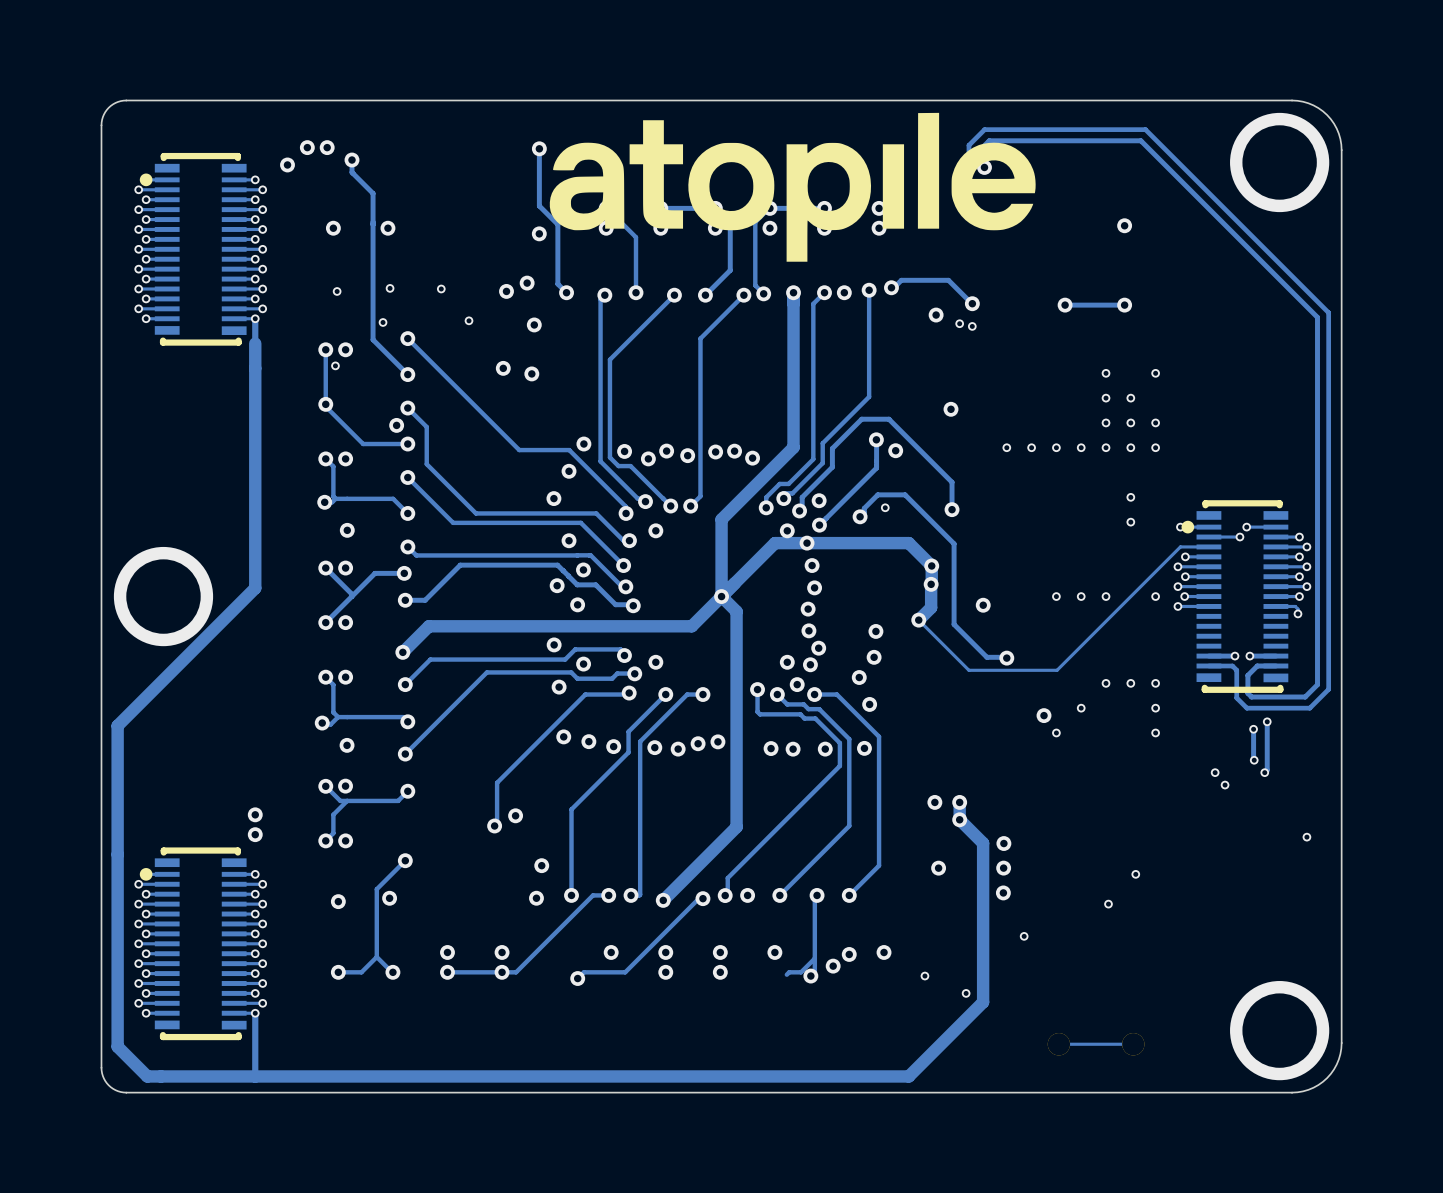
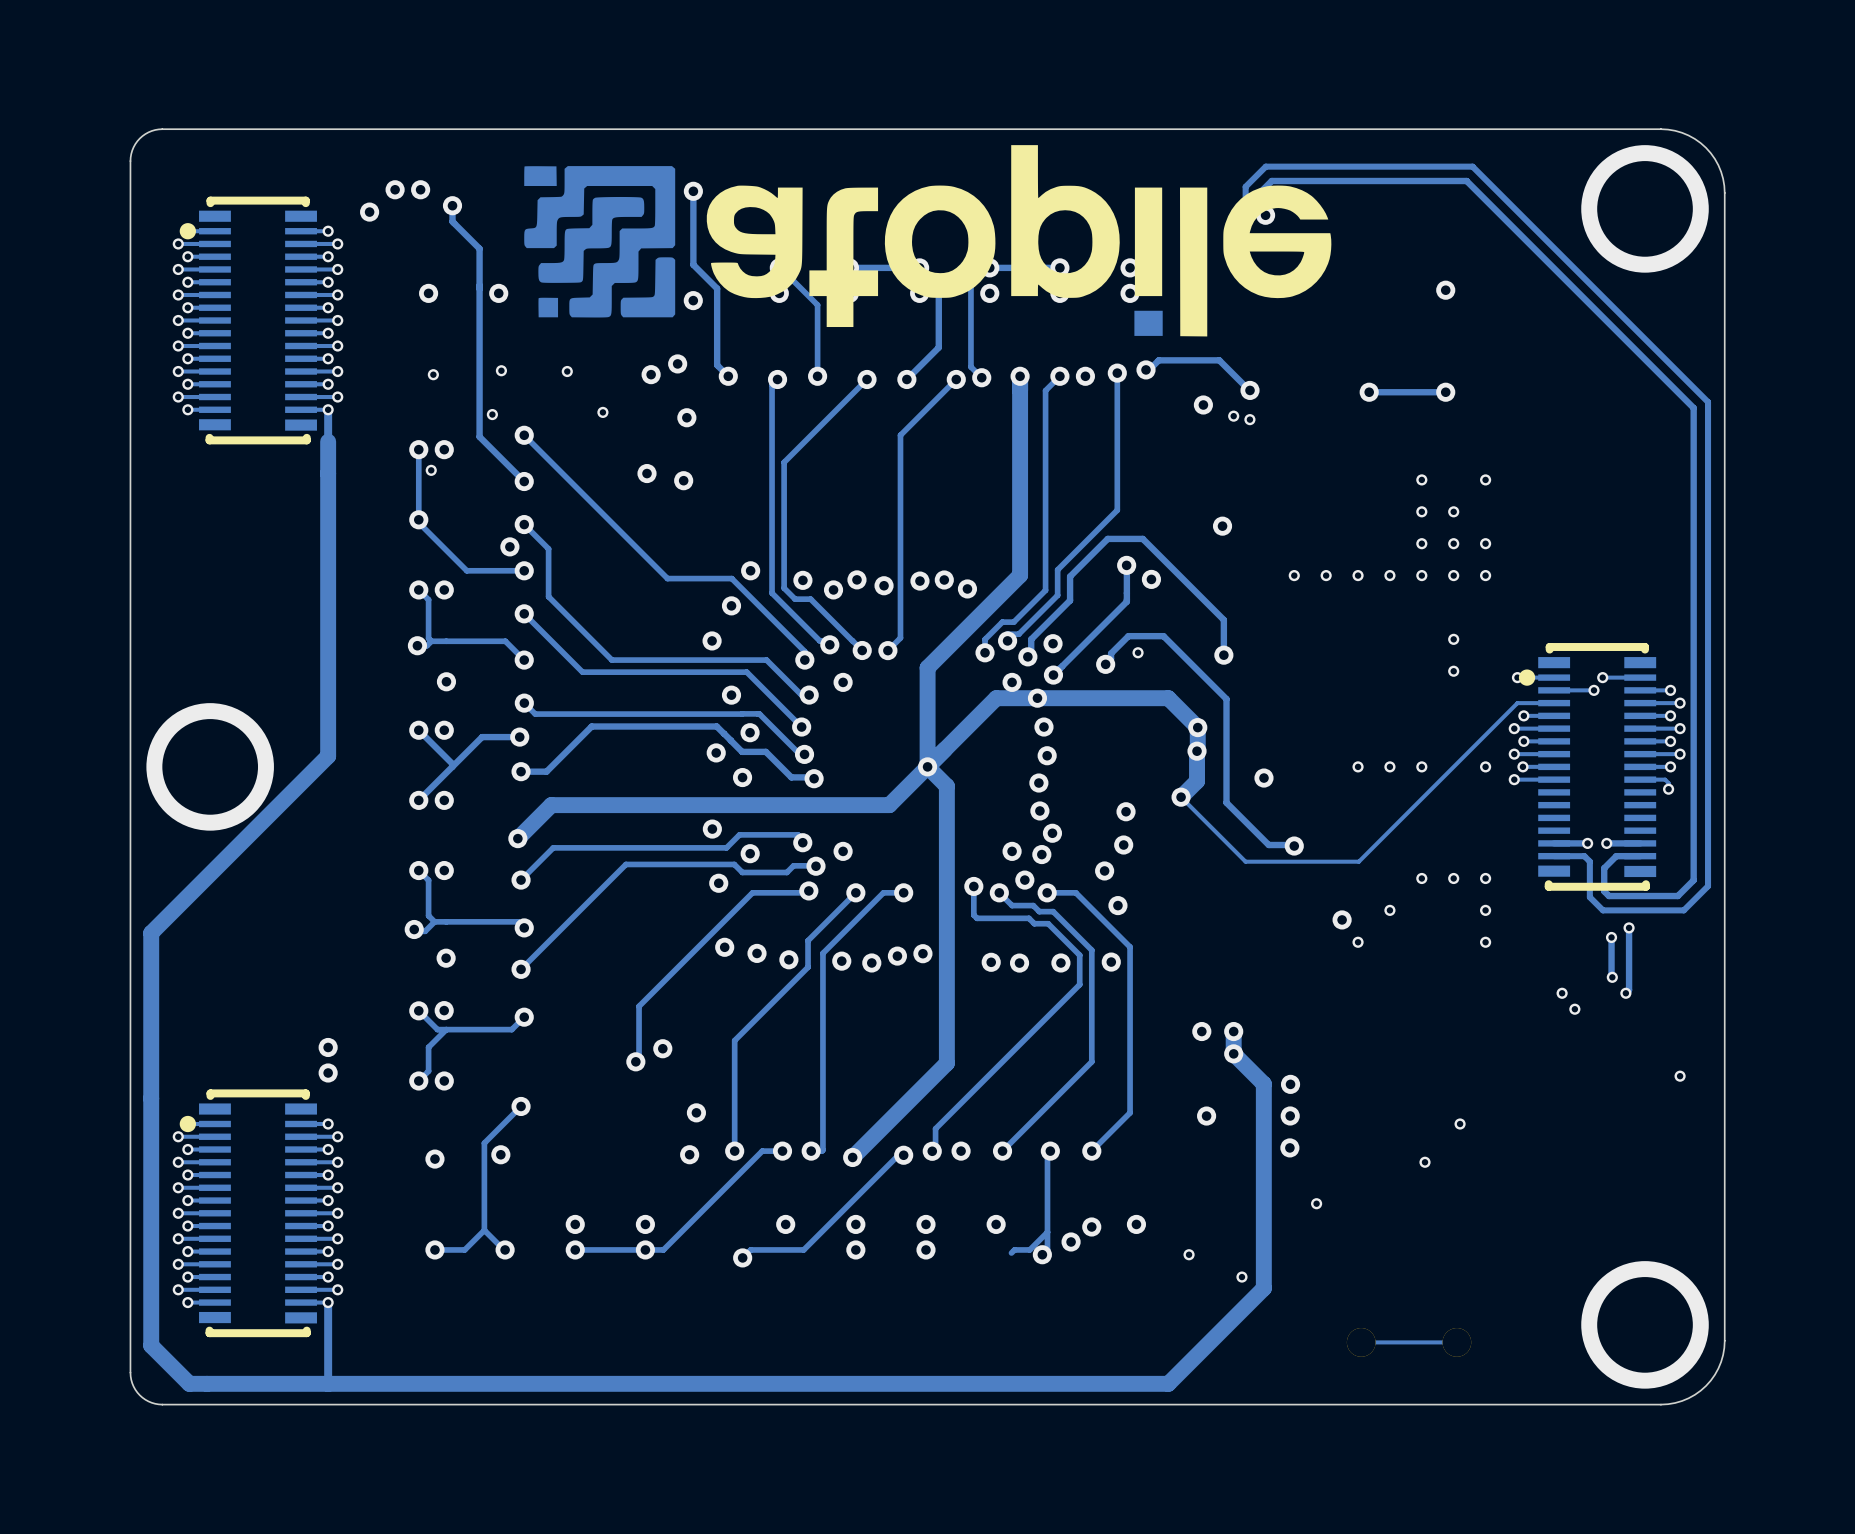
drawing: none -> [524, 145, 1332, 337]
drawing: [549, 112, 1036, 262] -> none

